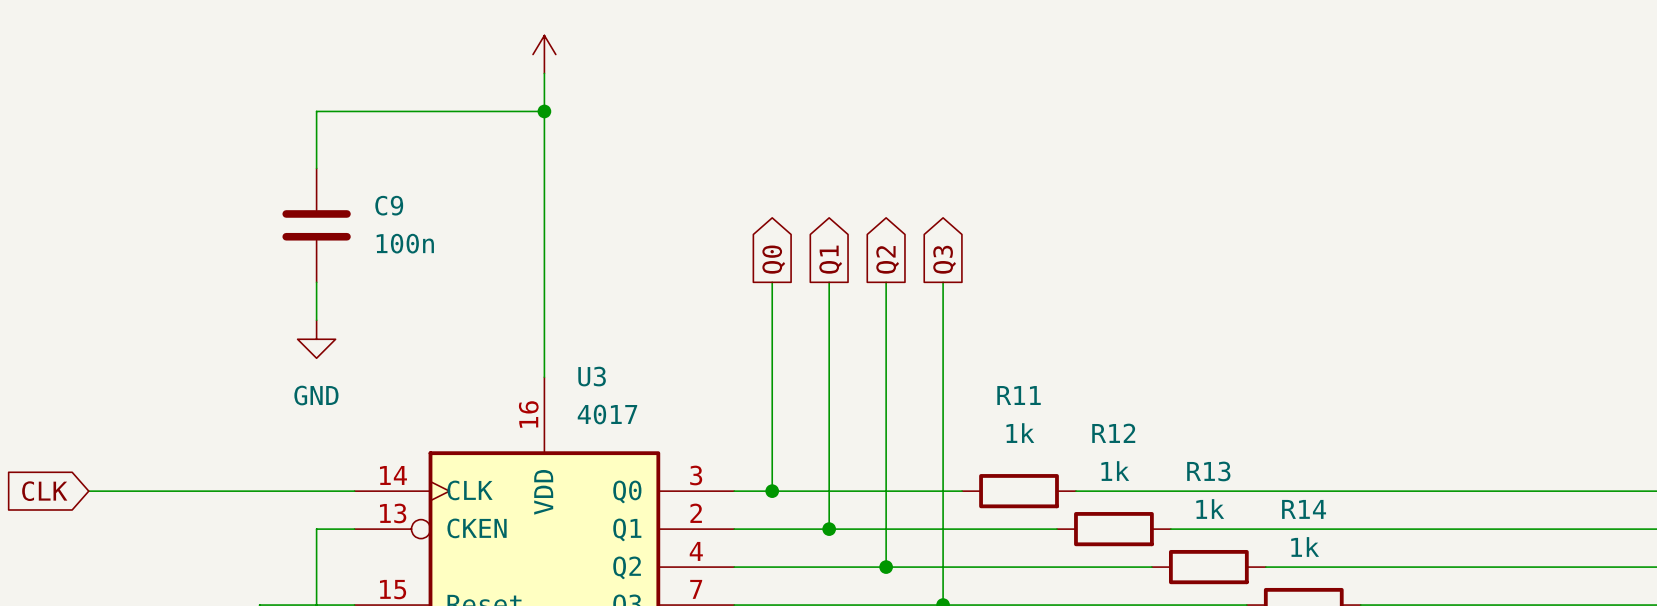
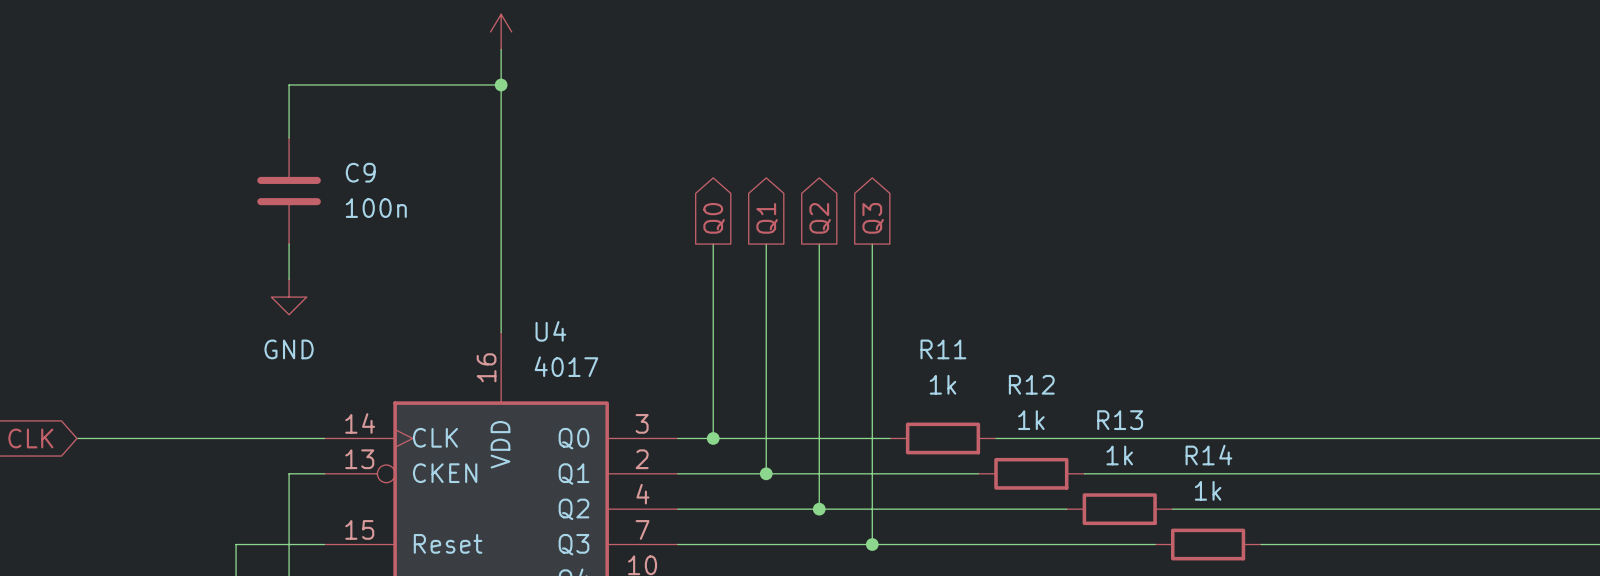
U3 name: U3 (592, 376) -> U4 (550, 331)

